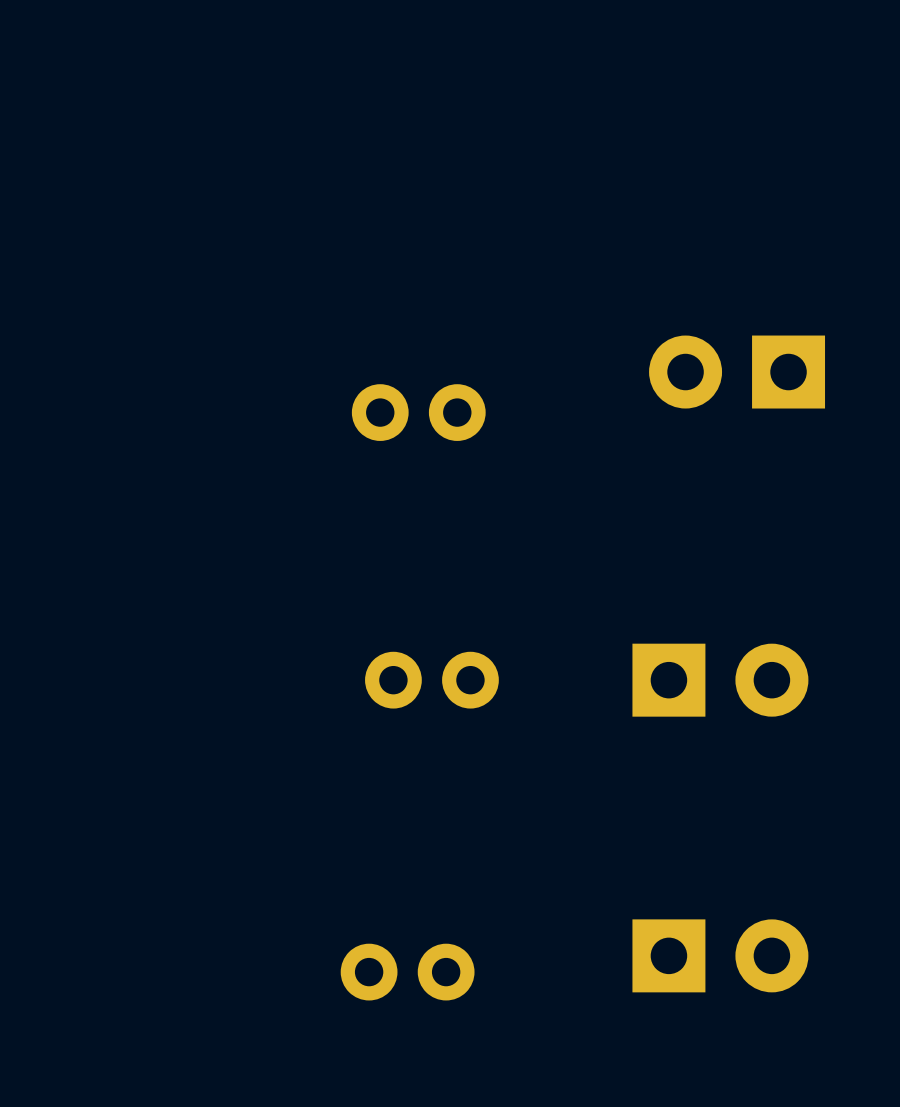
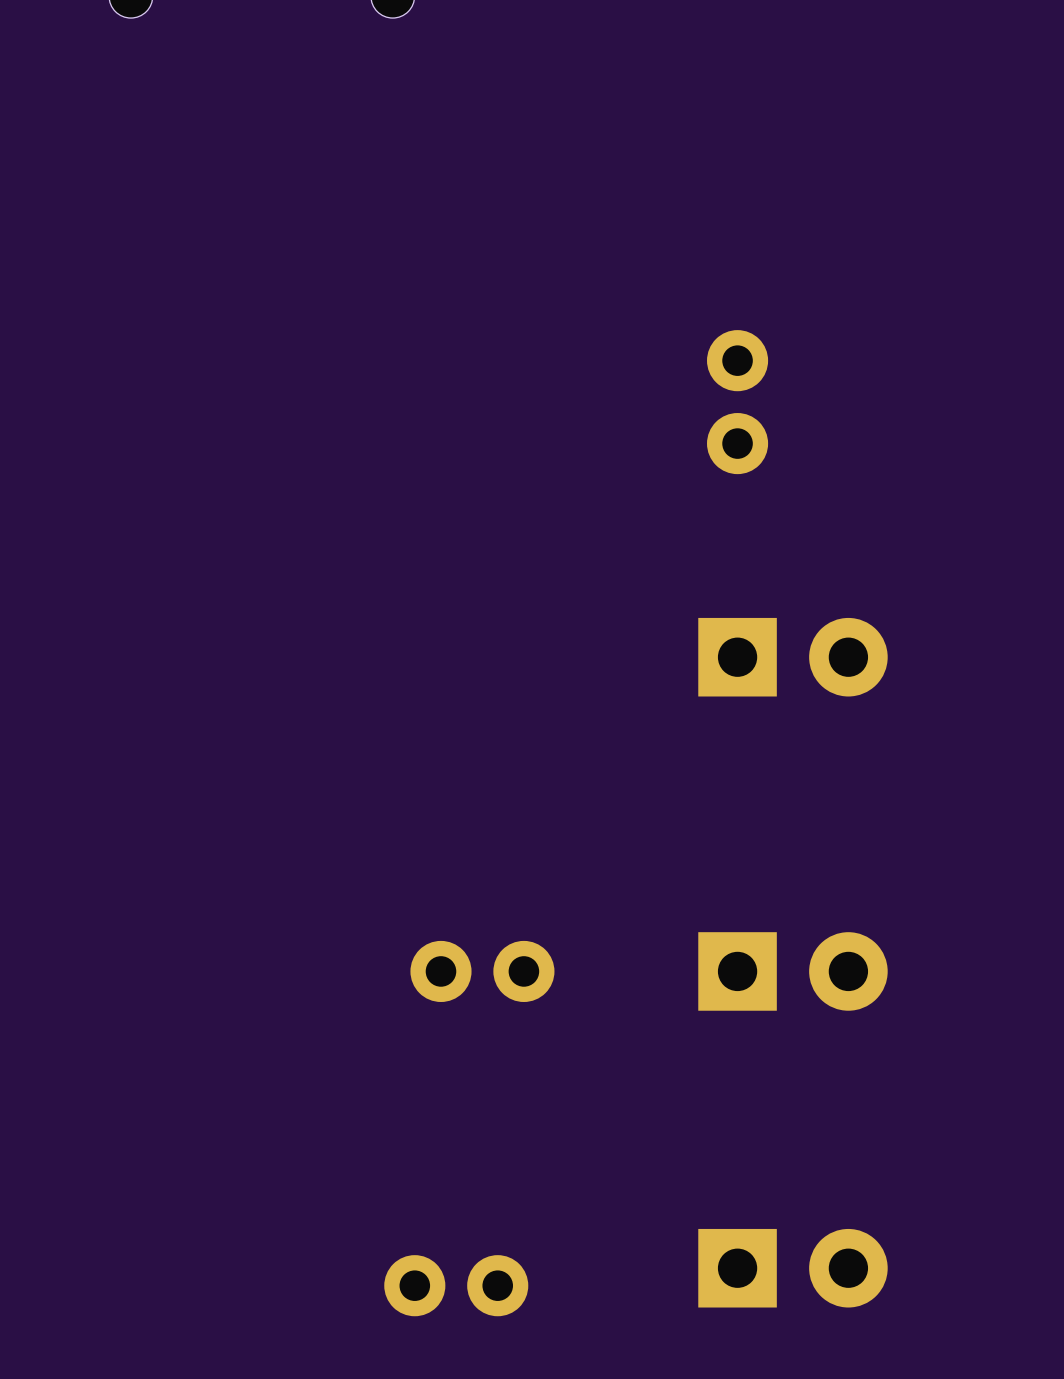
part rotation: 0° (737, 372) -> 180° (792, 657)
part rotation: 0° (418, 412) -> 90° clockwise (737, 402)
part position: (418, 412) -> (737, 402)

